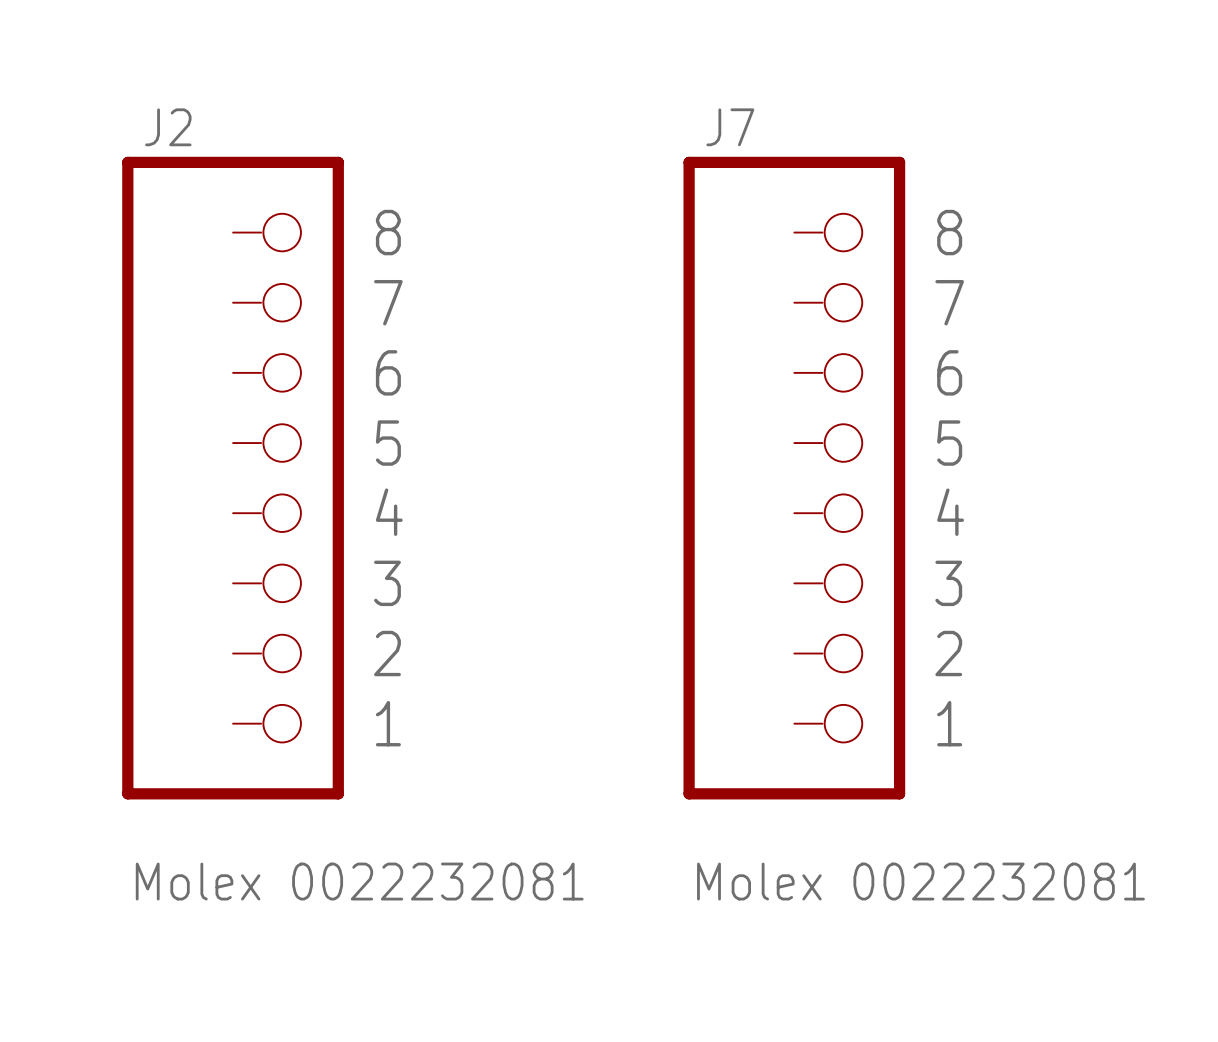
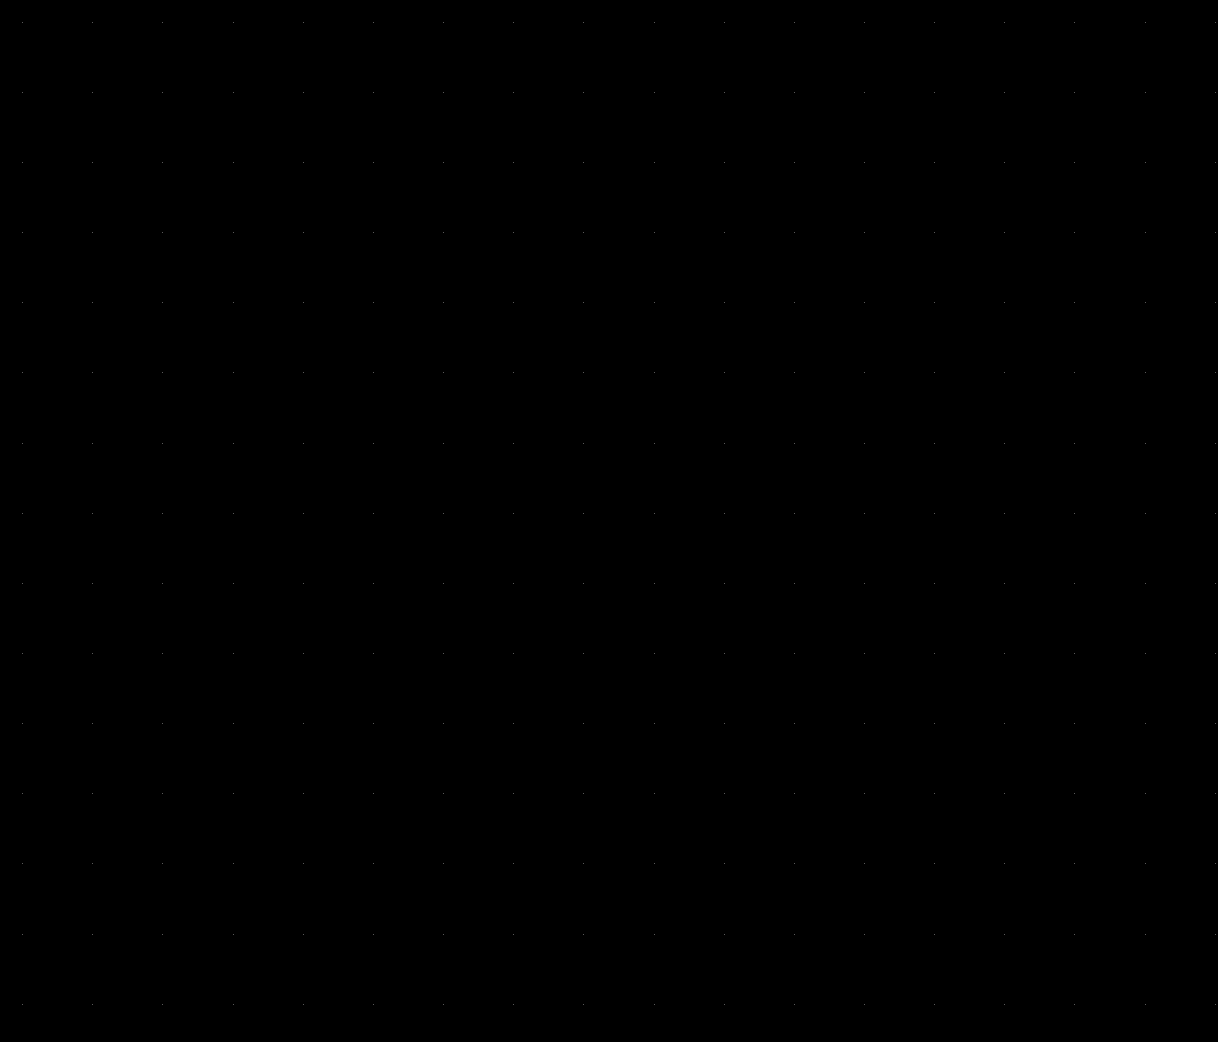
J2: Molex 0022232081 (233, 478) -> none
J7: Molex 0022232081 (794, 478) -> none

